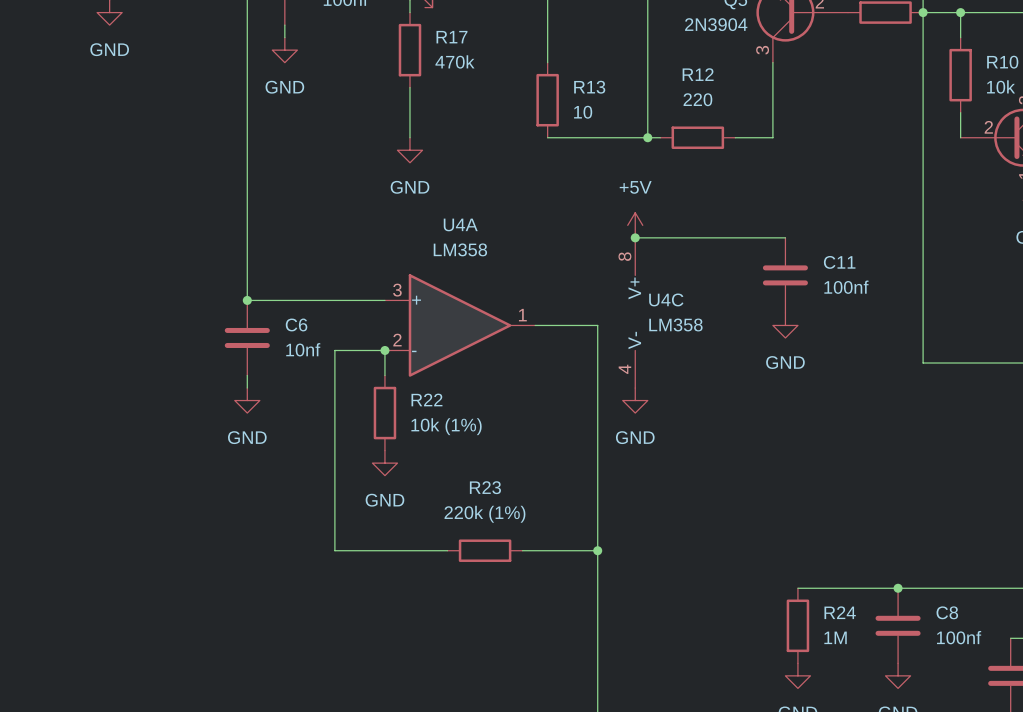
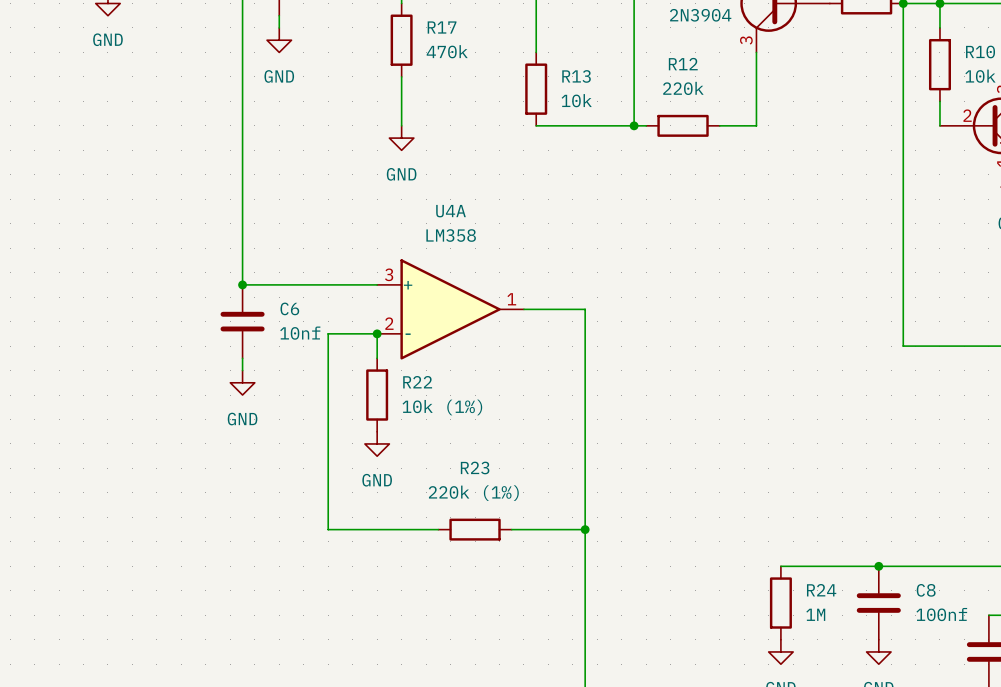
R12 value: 220 (697, 99) -> 220k (683, 88)
R13 value: 10 (583, 112) -> 10k (576, 100)
power symbol: +5V (635, 225) -> none
wire: (635, 237) (785, 237) -> none
junction: (635, 237) -> none
C11: 100nf (785, 275) -> none
U4C: LM358 (635, 312) -> none
power symbol: GND (785, 325) -> none
power symbol: GND (635, 400) -> none

